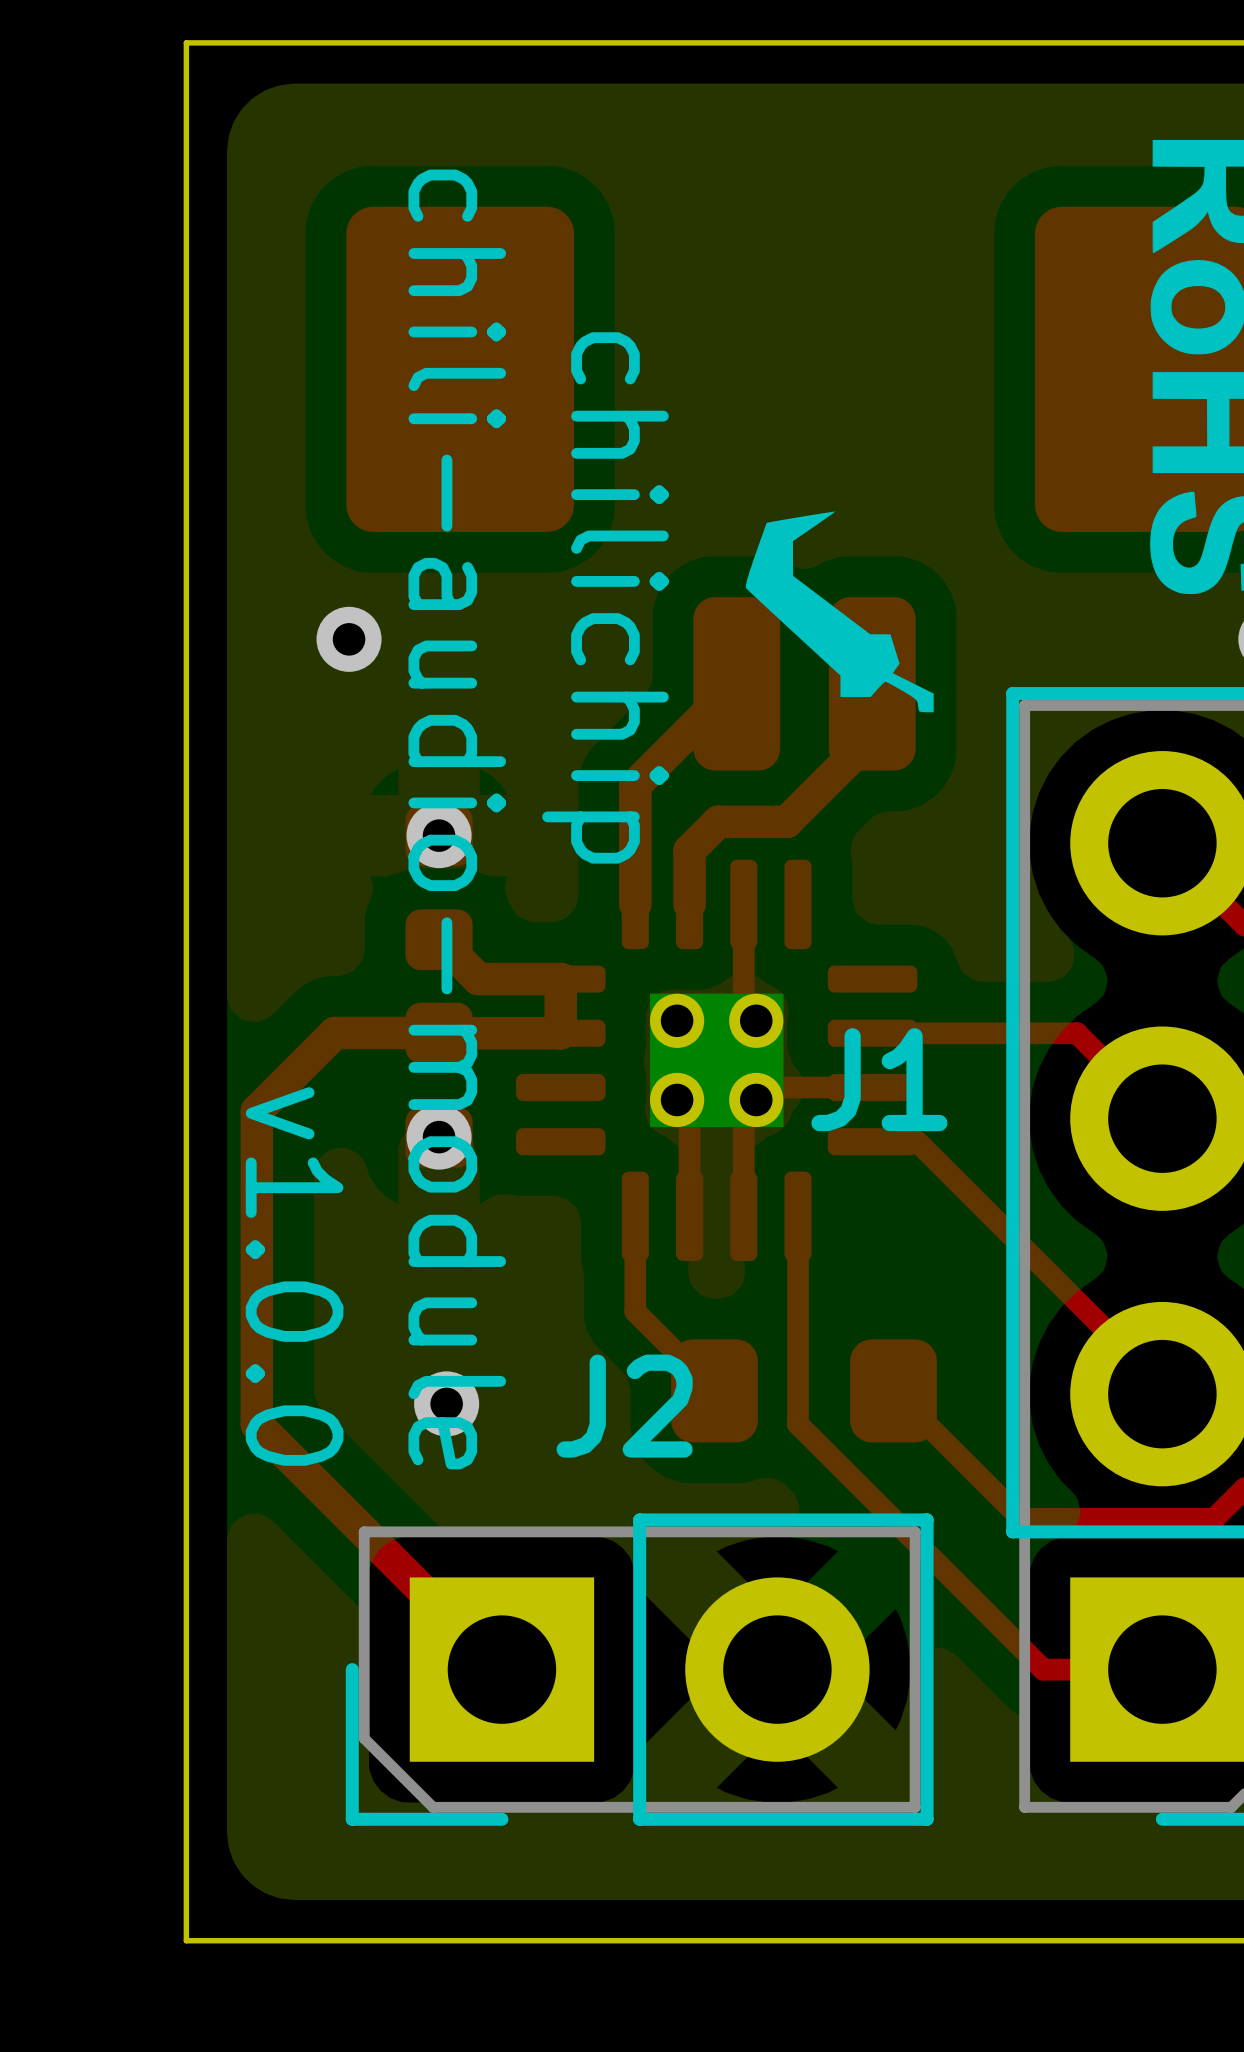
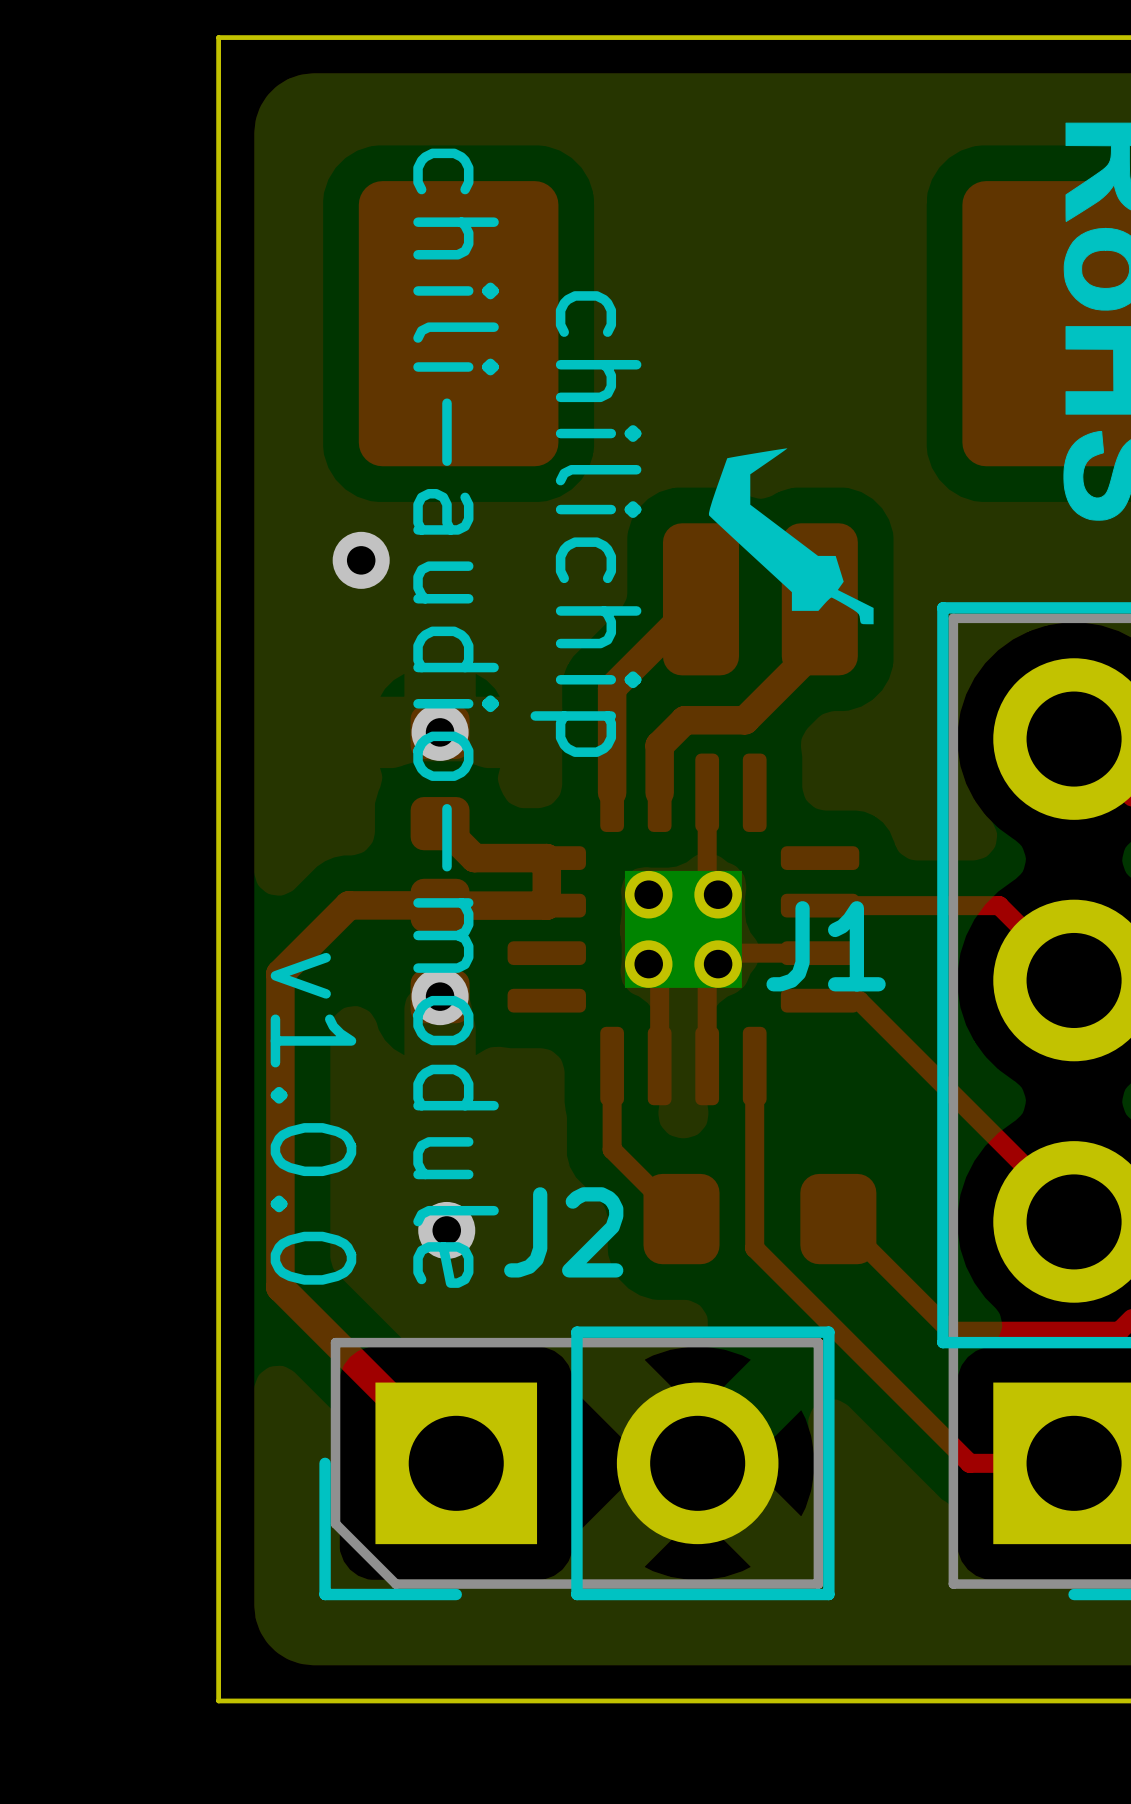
top track: (256, 1424) (501, 1669) -> (280, 1248) (280, 1287) (456, 1463)
J2 position: (639, 1669) -> (576, 1463)

